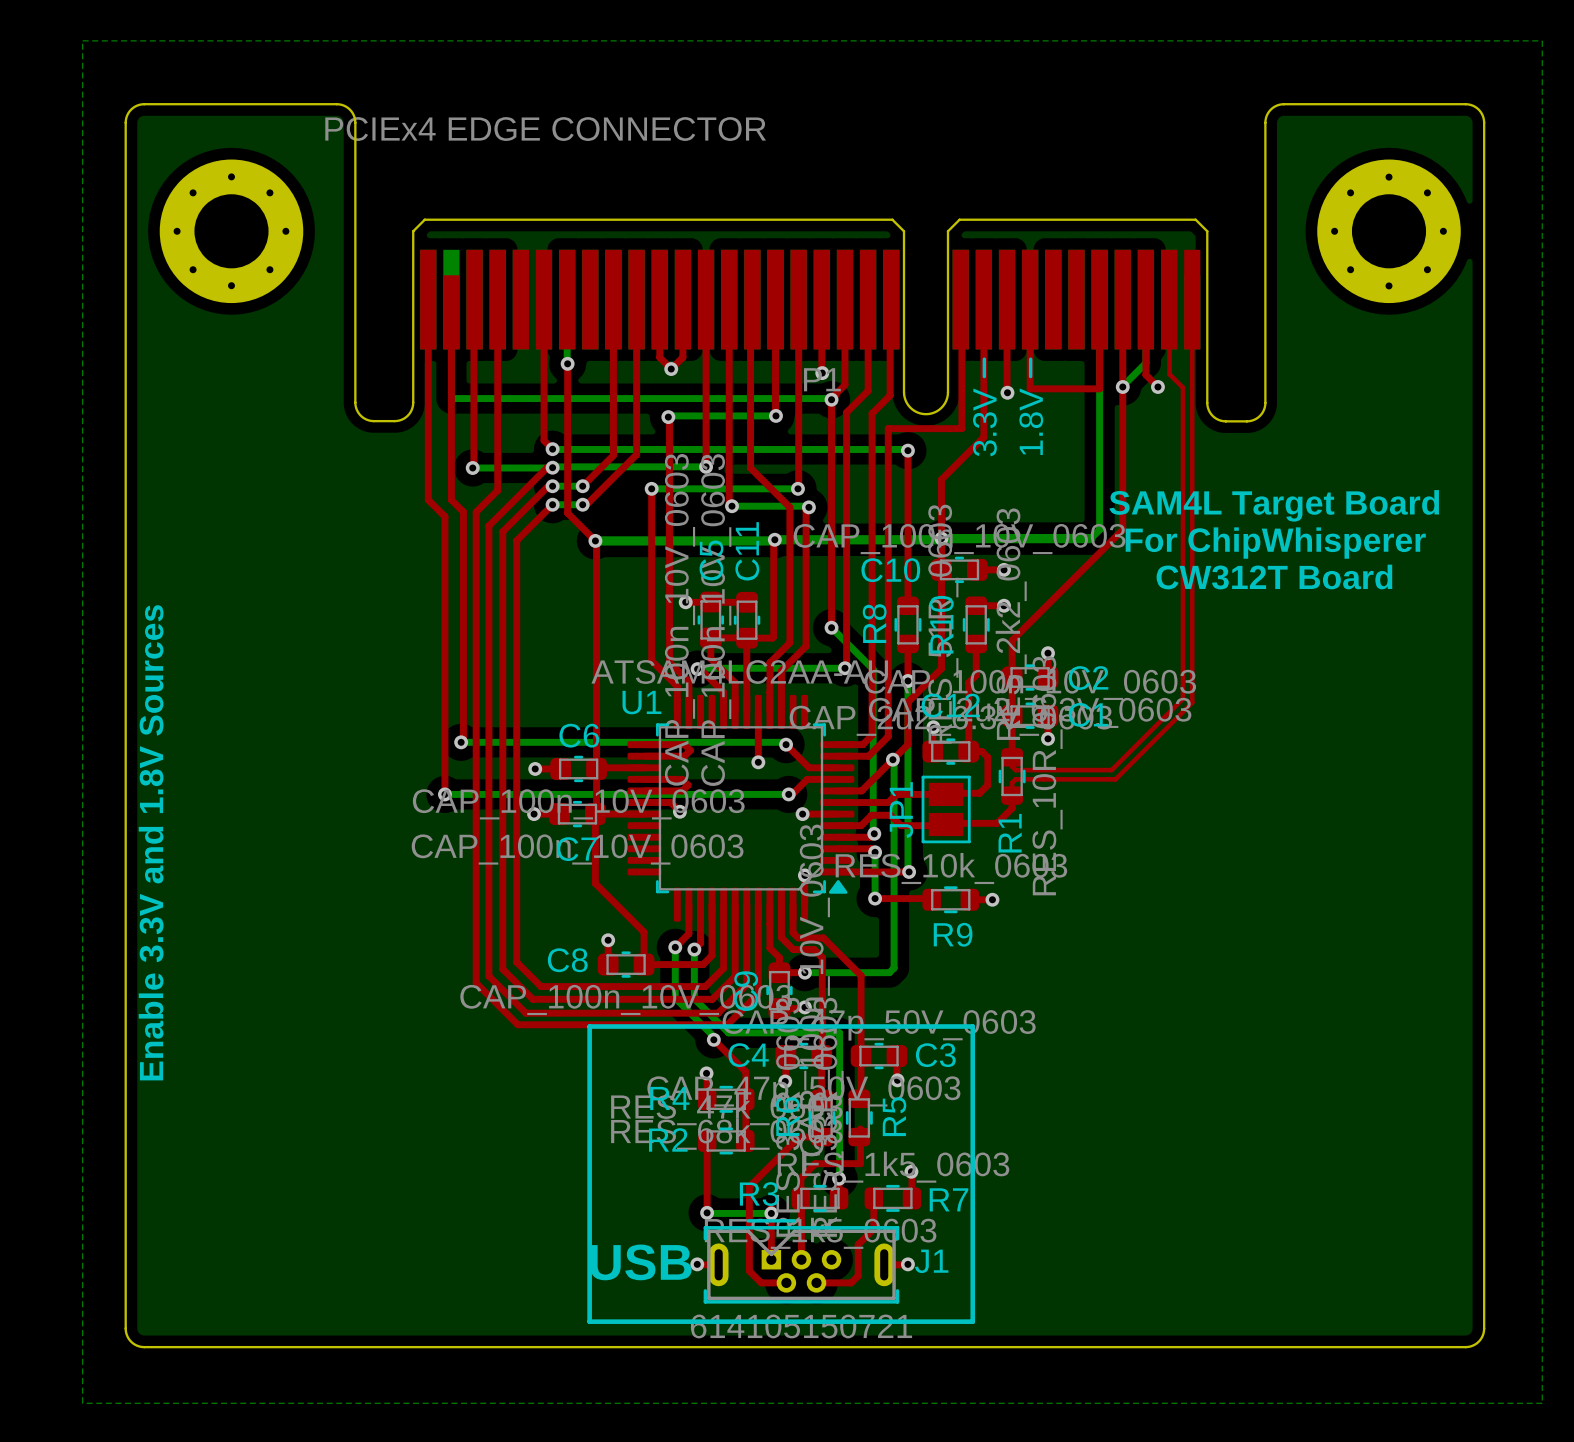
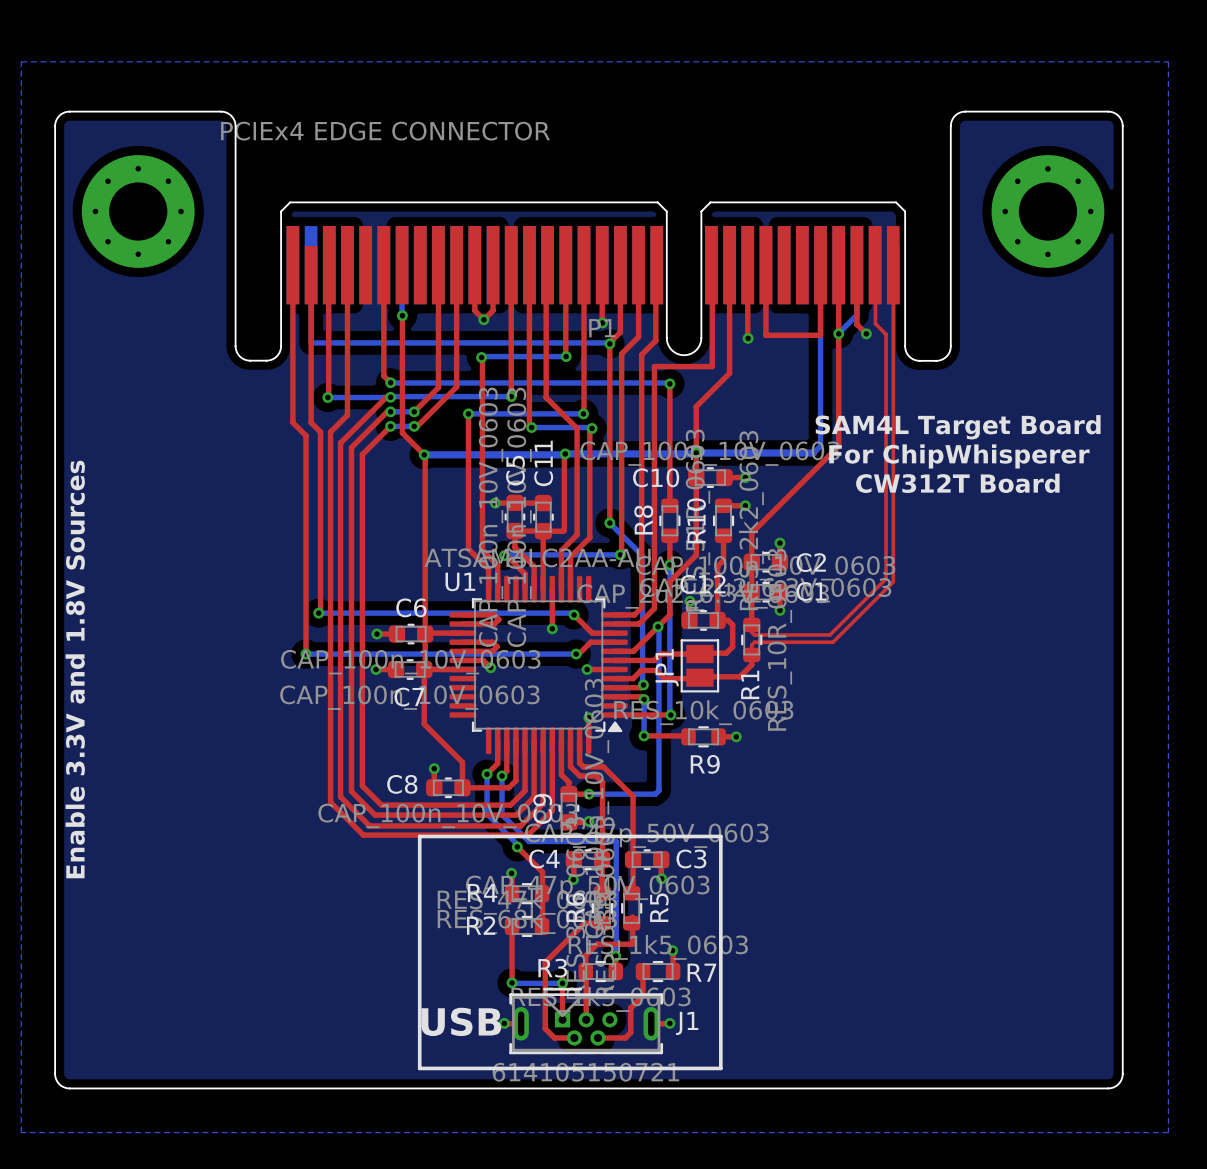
line: (984, 359) (984, 376) -> none
line: (1030, 359) (1030, 376) -> none
text: 1.8V (1031, 421) -> none
text: 3.3V (984, 422) -> none

